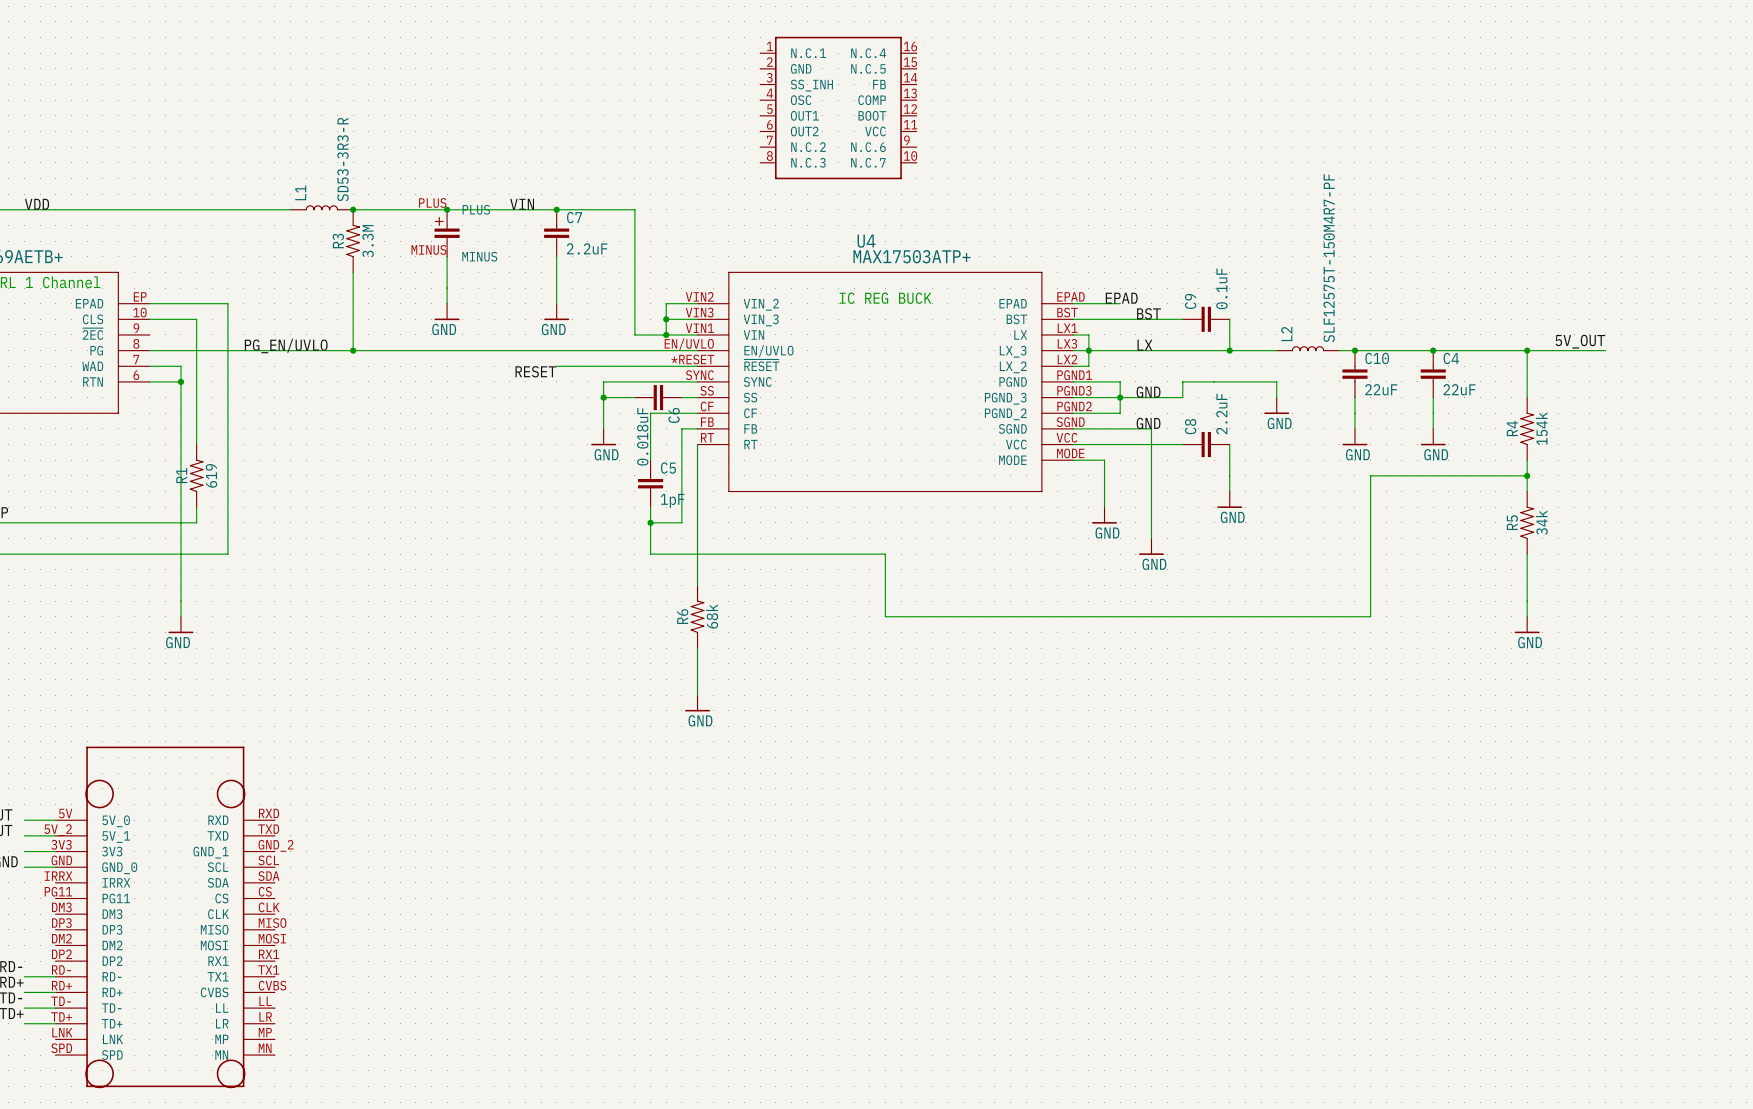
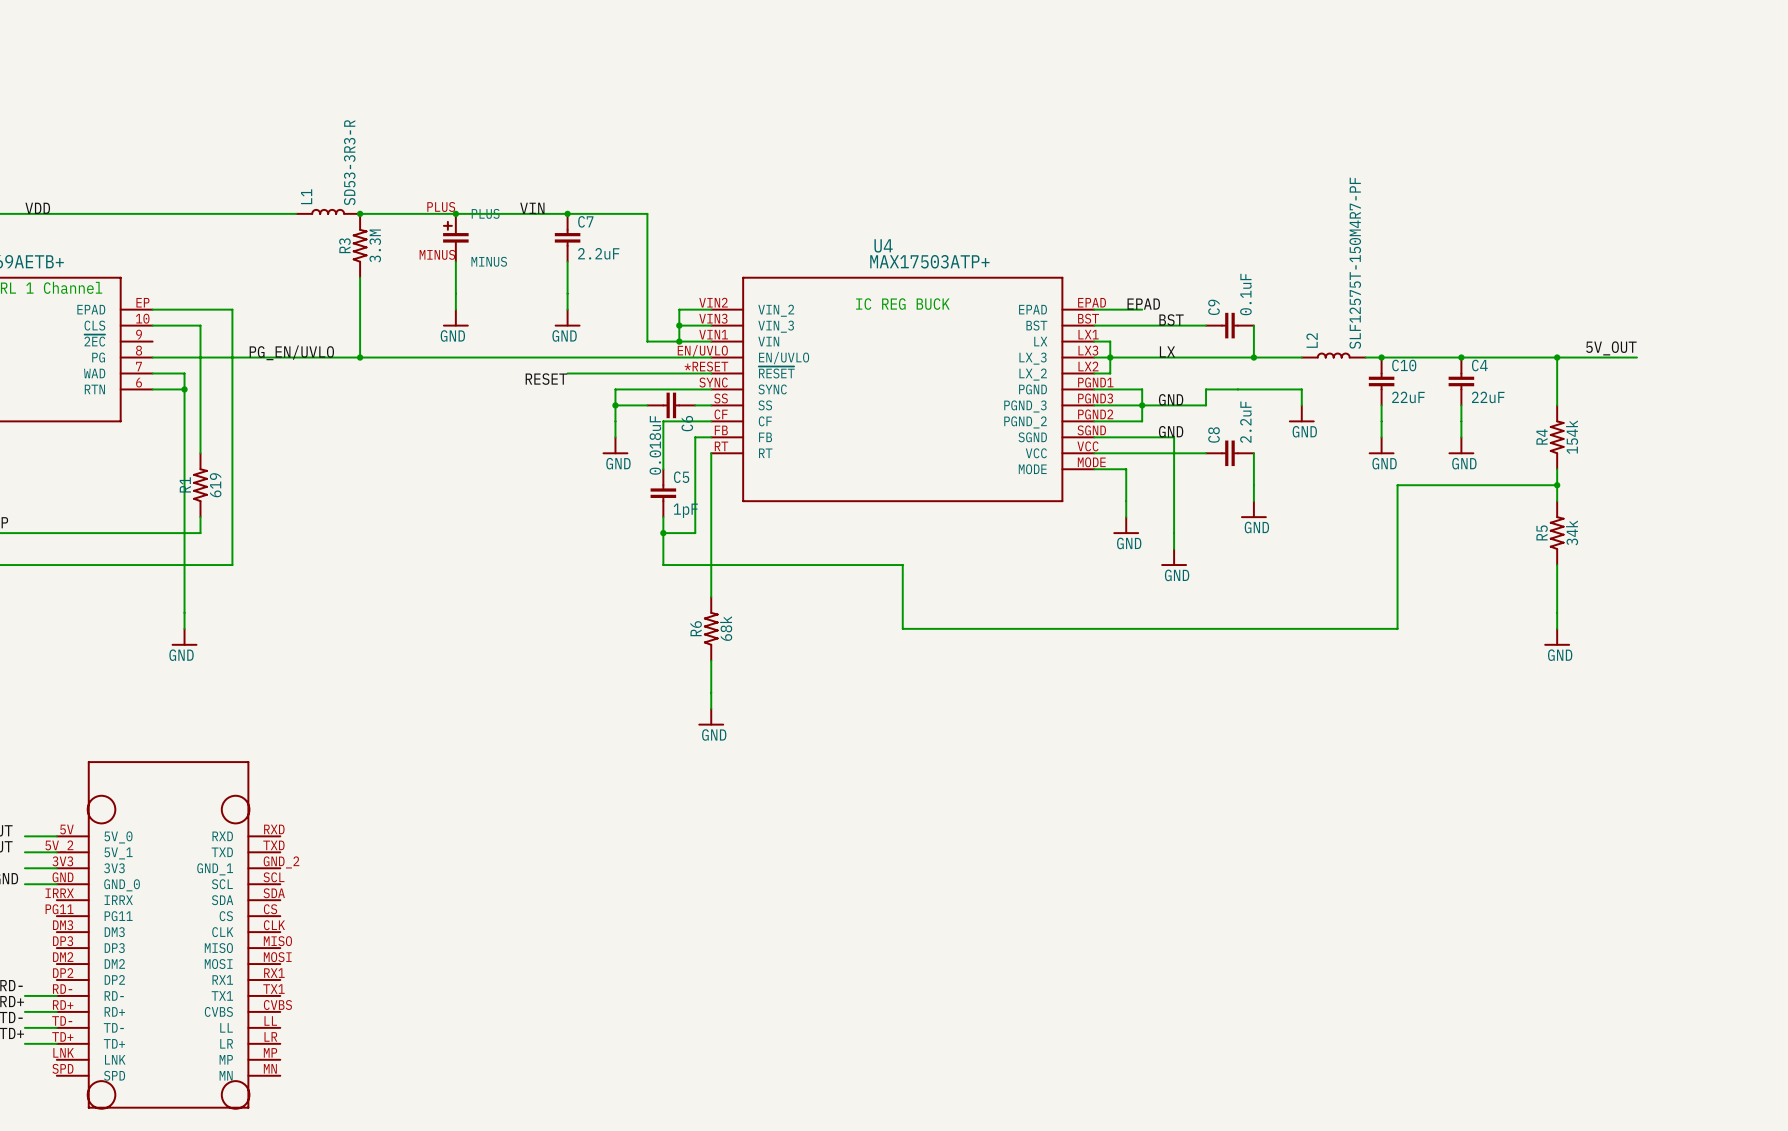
part: (838, 108) -> none

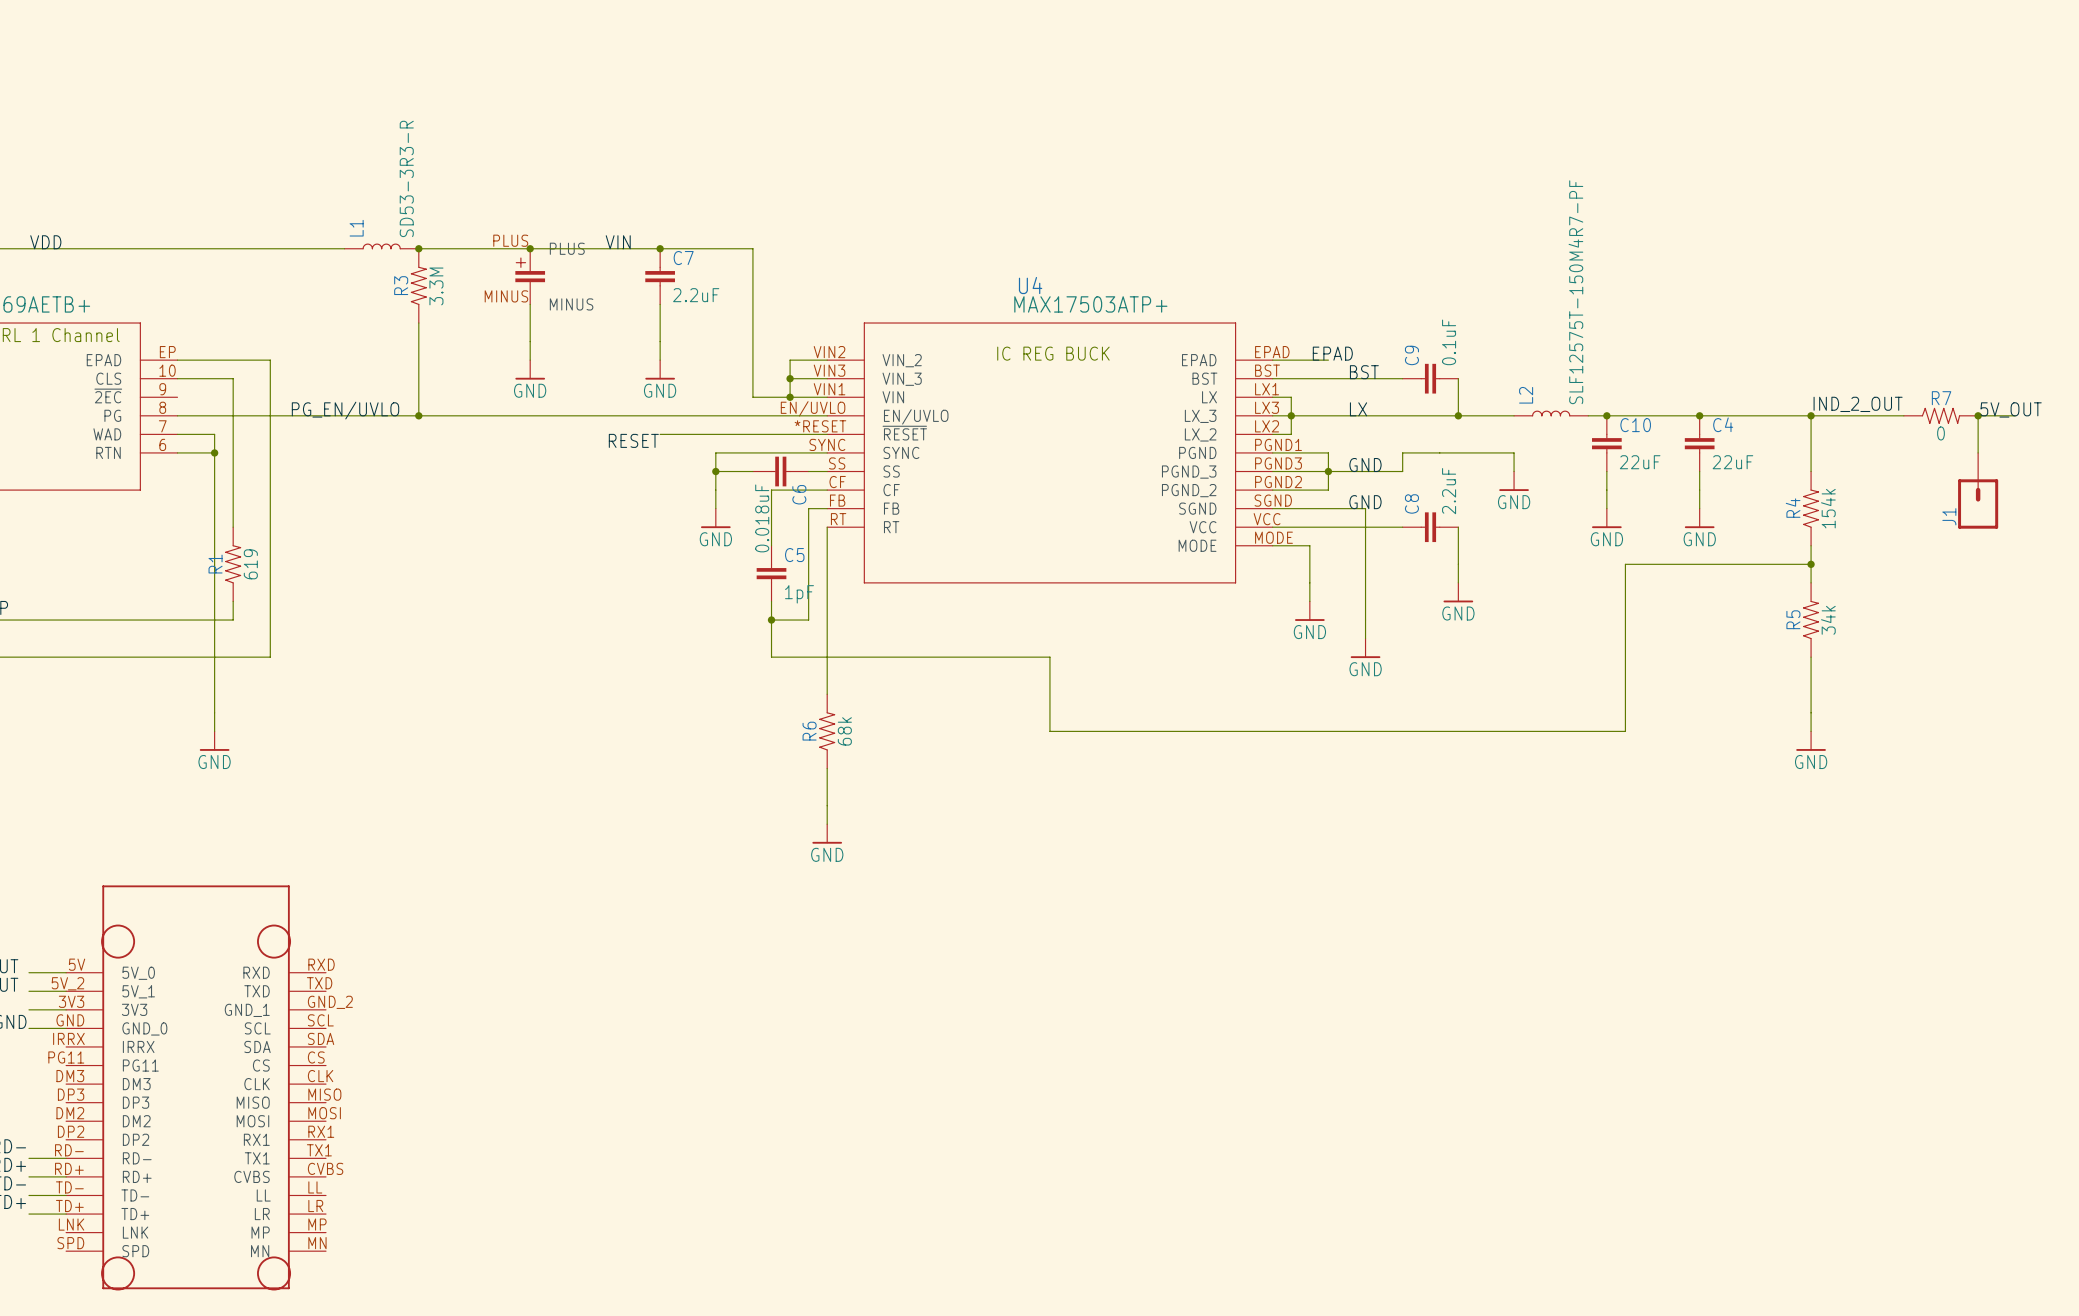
label: 5V_OUT (1611, 348) -> IND_2_OUT (1858, 404)
label: none -> 5V_OUT (2011, 409)
R7: none -> 0 (1941, 415)
junction: none -> (1978, 415)
wire: none -> (2015, 415) (1978, 415) (1978, 452)
J1: none -> (1978, 490)

